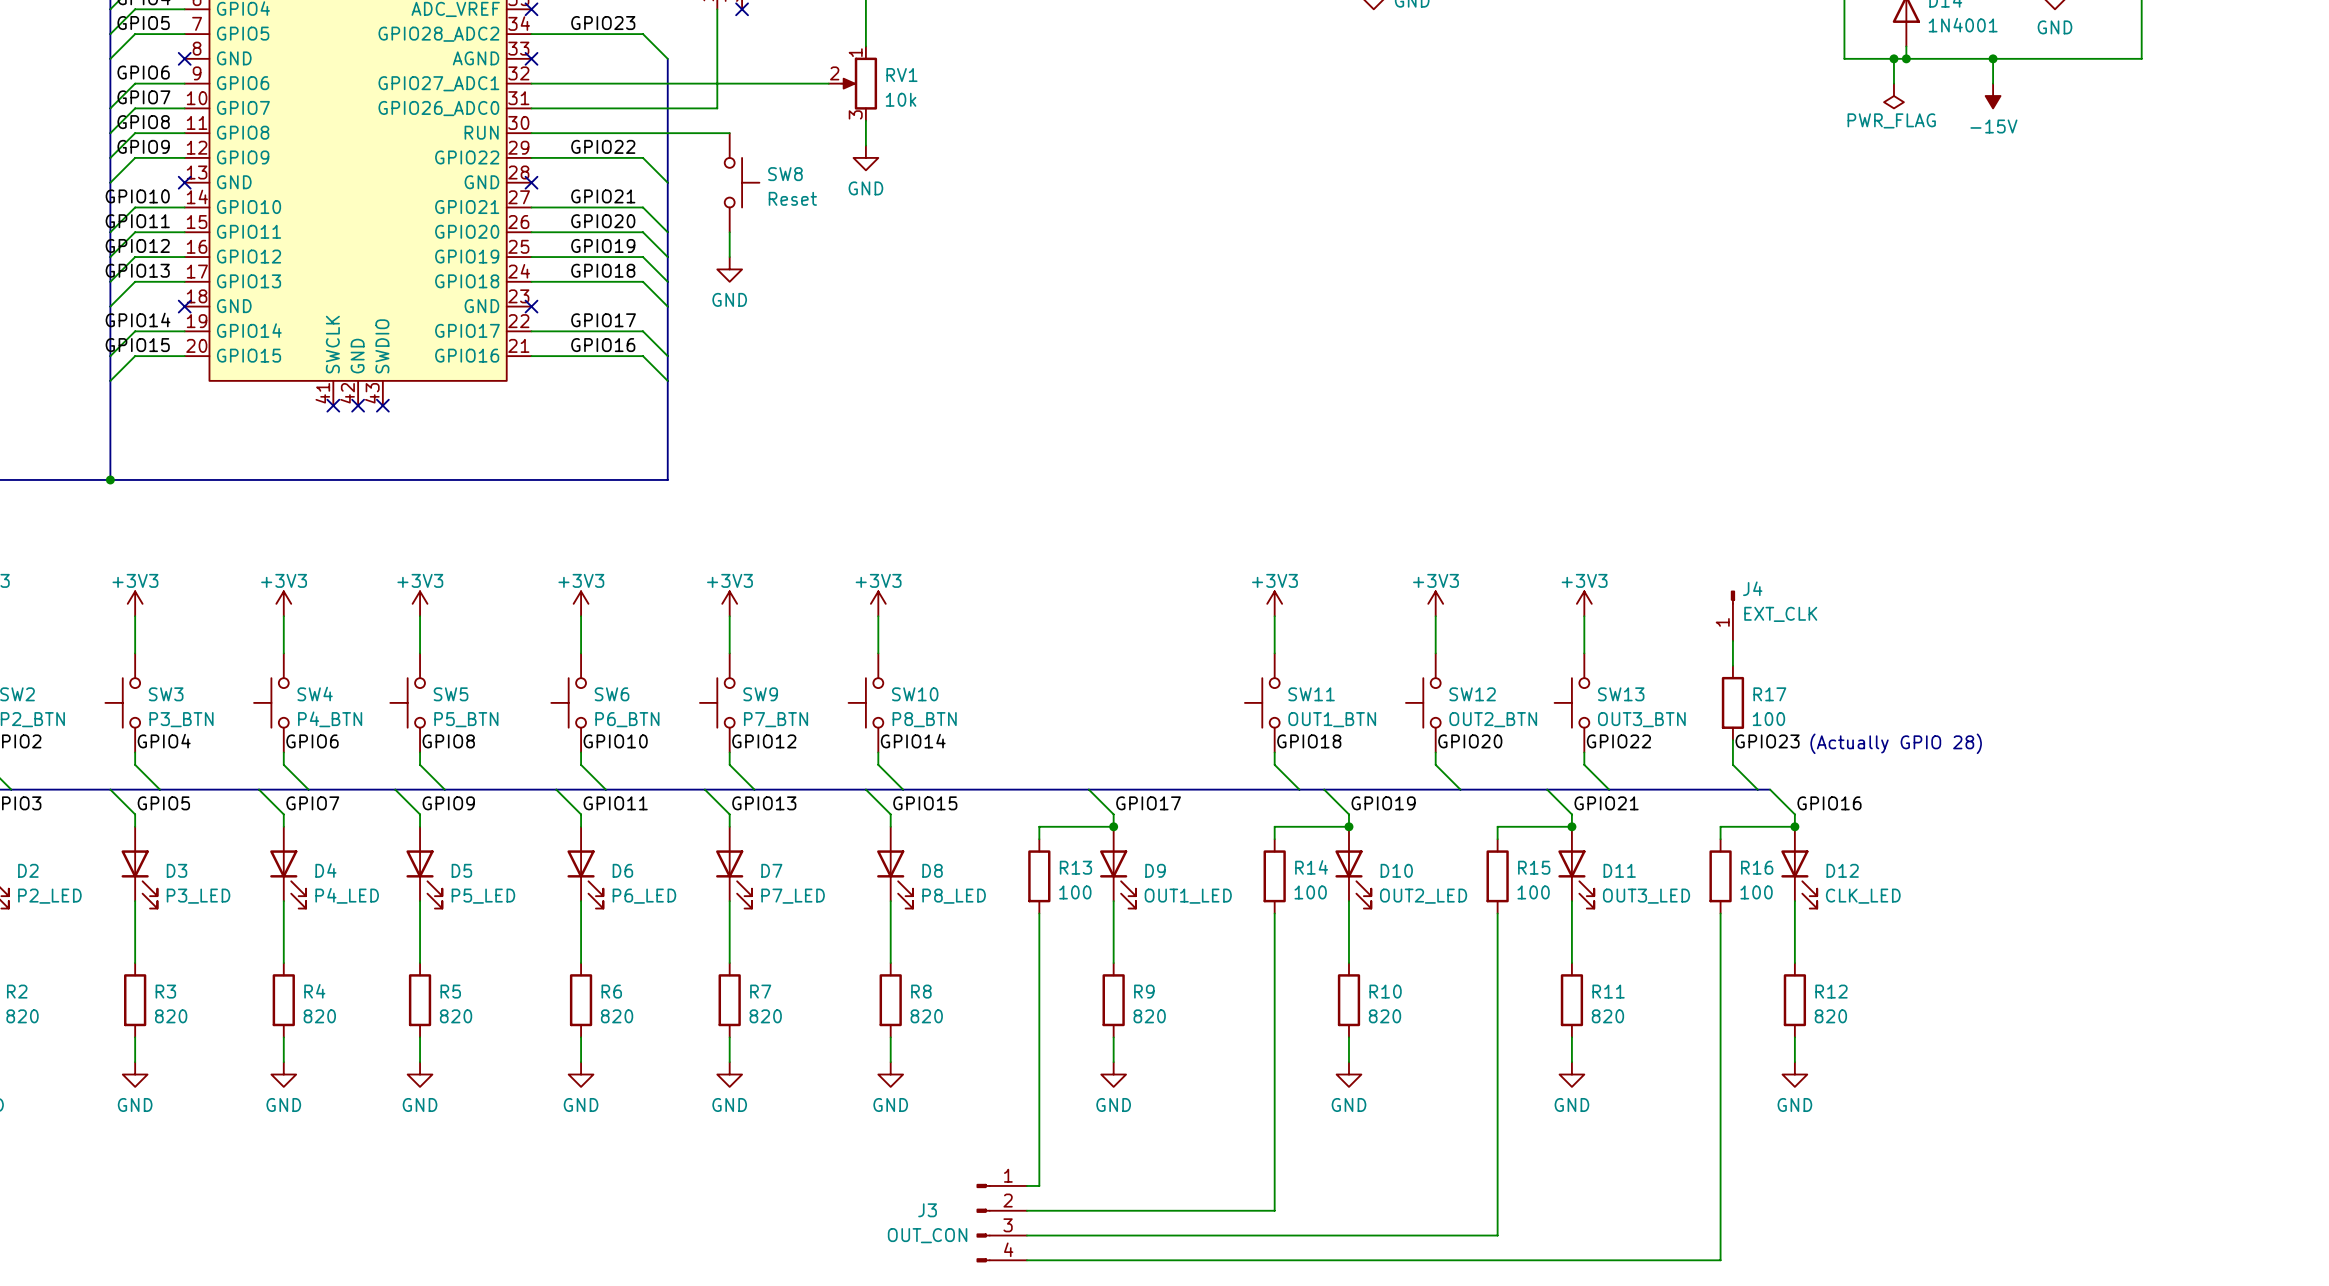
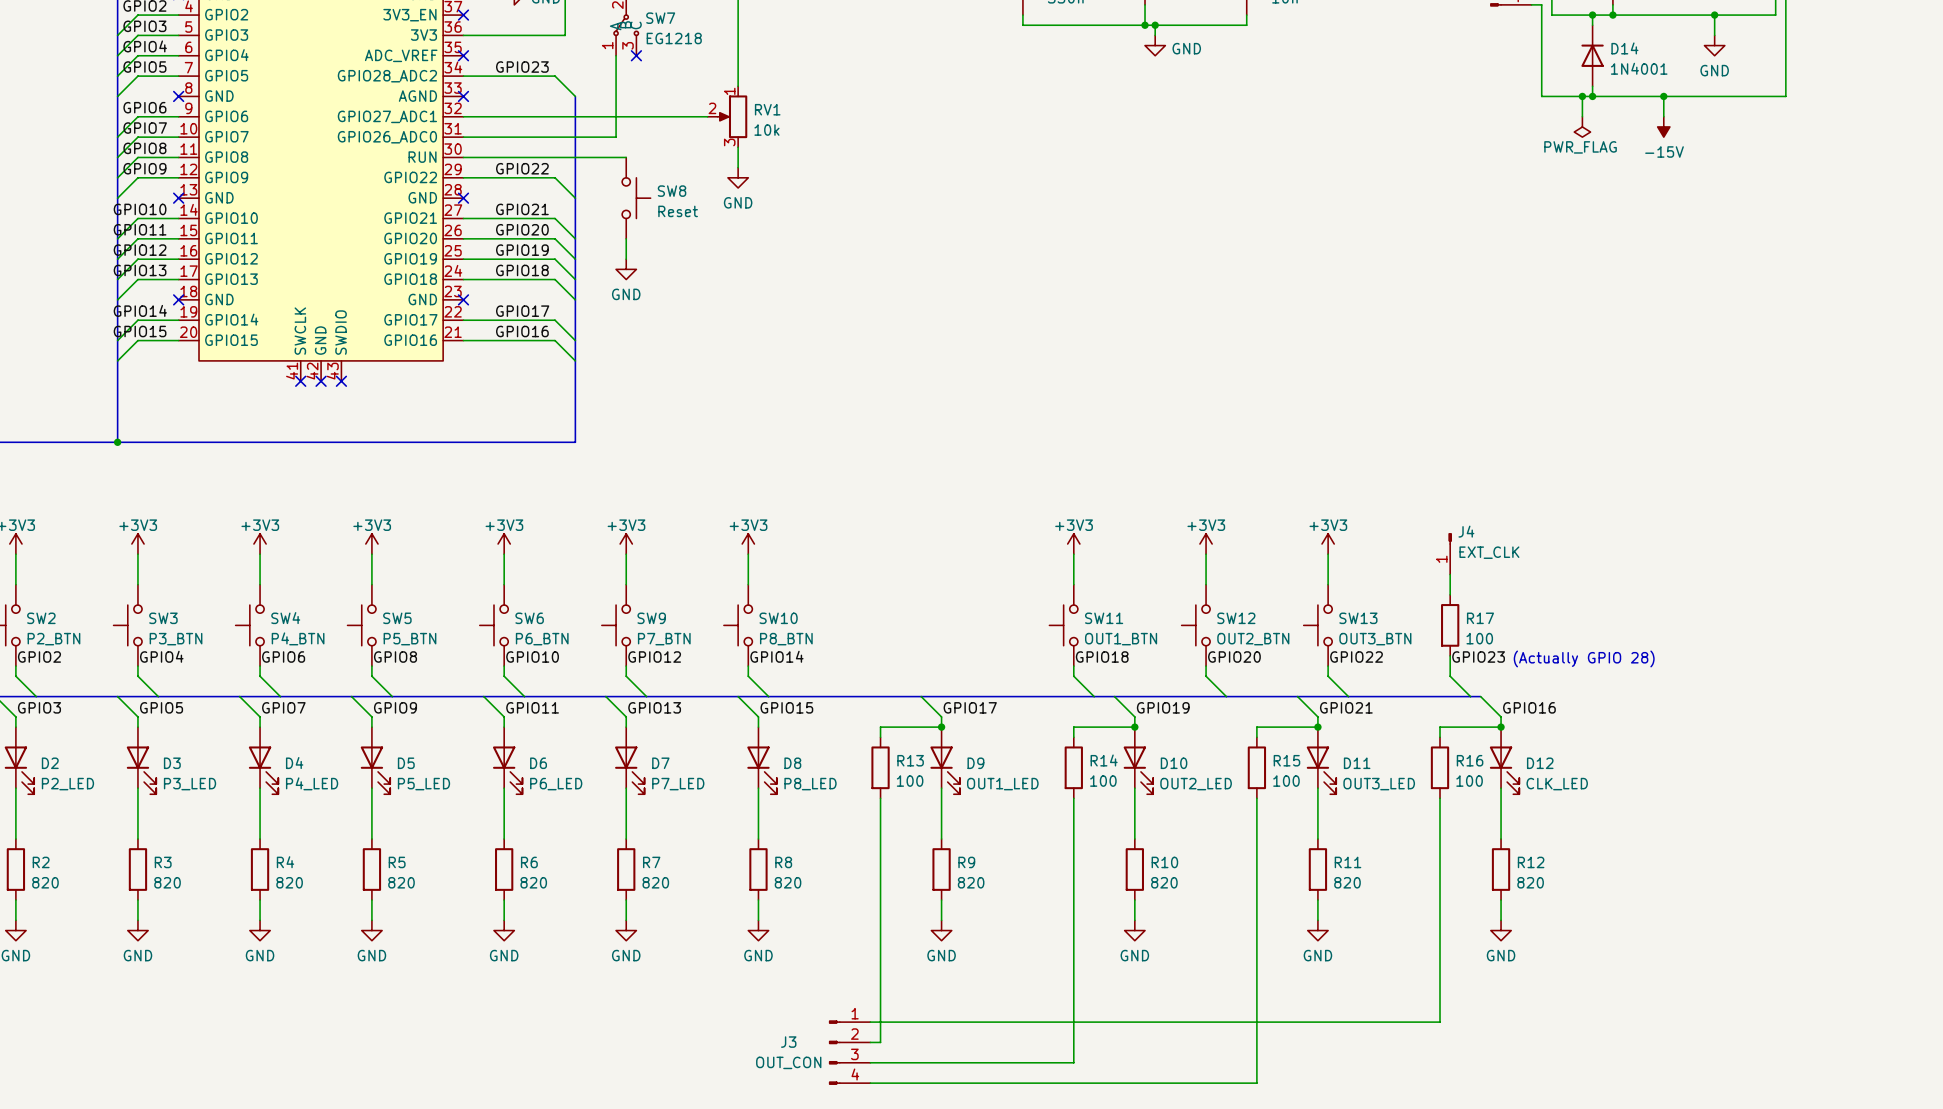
wire: (1720, 1185) (1720, 1260) (1497, 1260) -> (1256, 1062) (1256, 1083)
wire: (1039, 1210) (1274, 1210) -> (880, 1042) (880, 1022) (1440, 1022)
wire: (1274, 1235) (1497, 1235) -> (1073, 1062) (1073, 1042)

